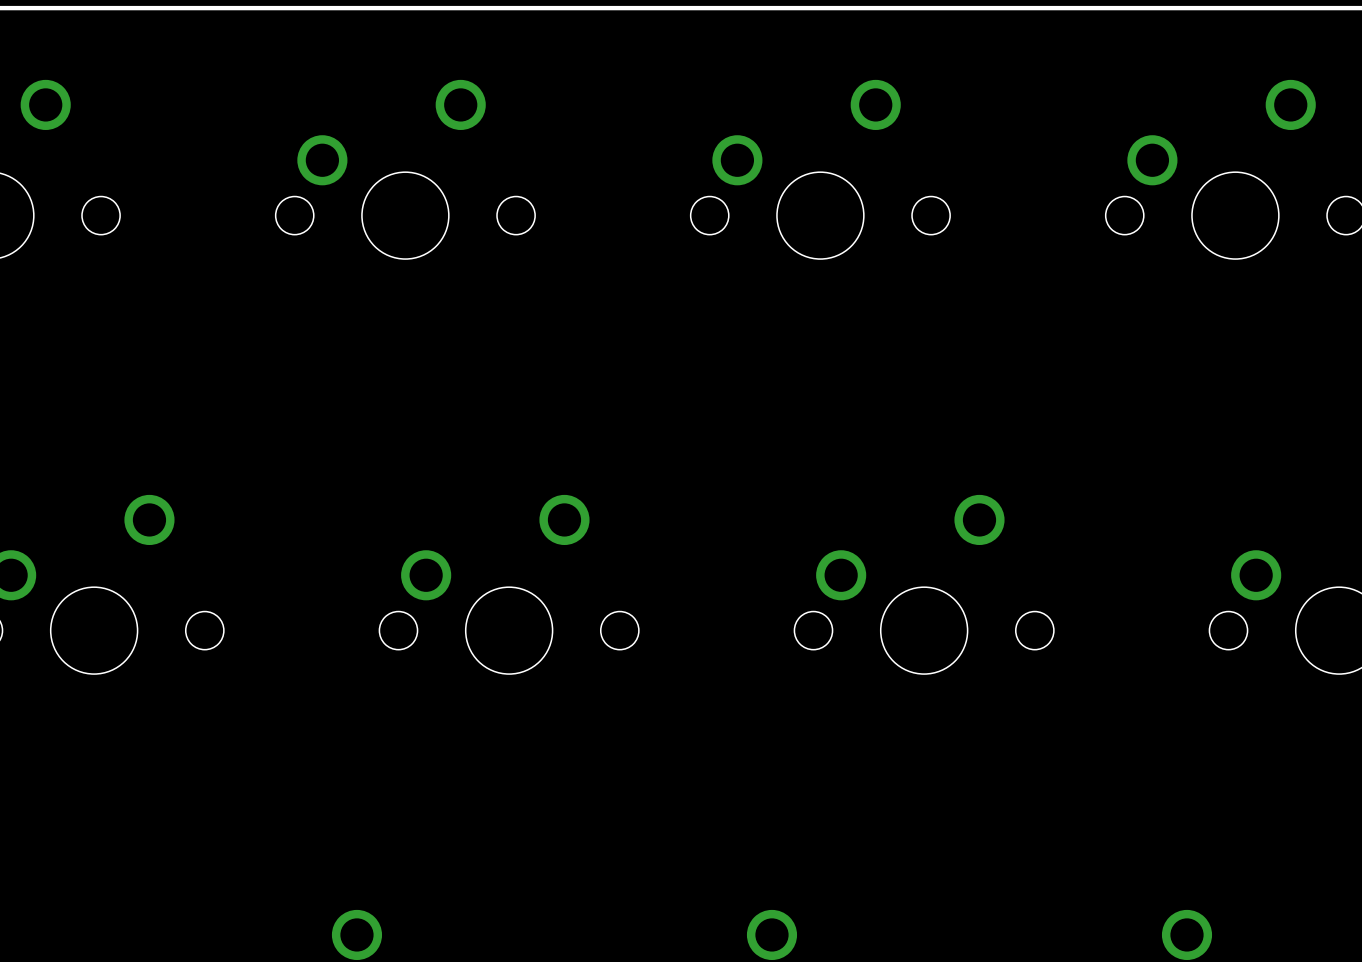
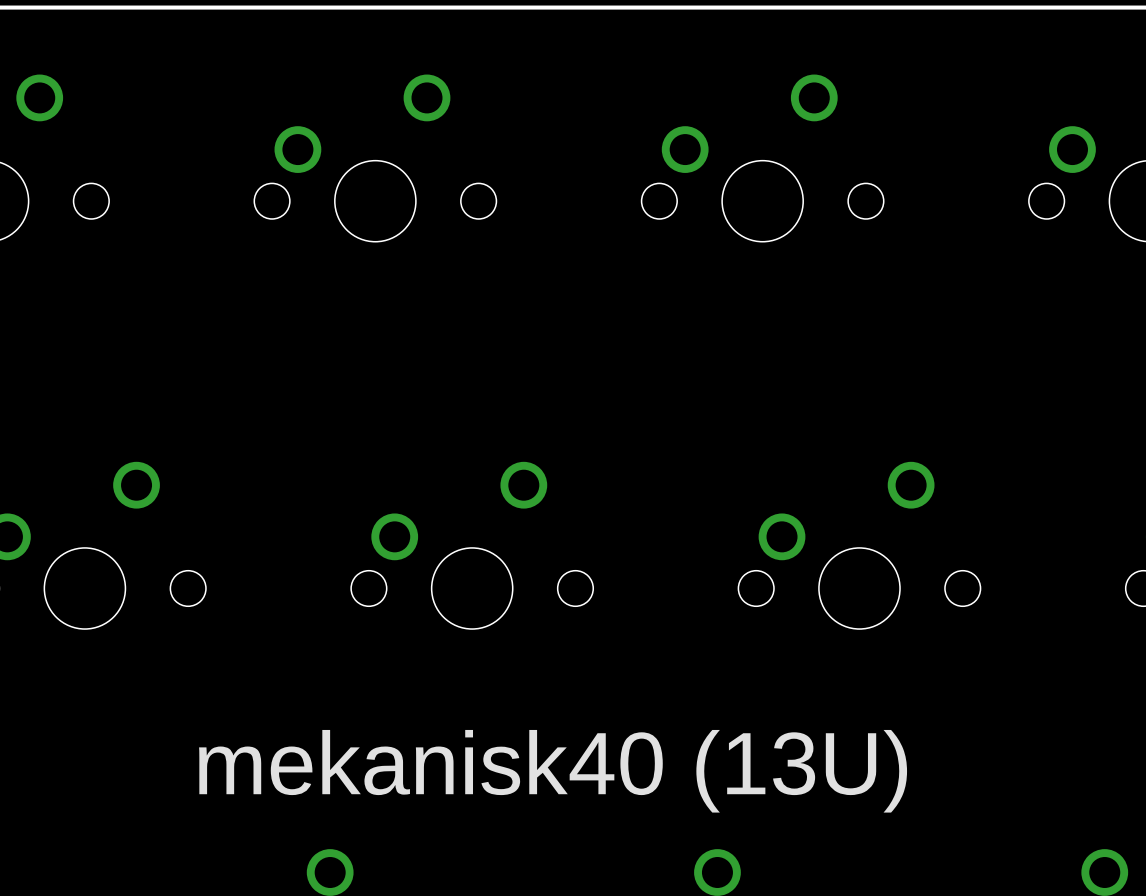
text: none -> mekanisk40 (13U) (553, 771)

